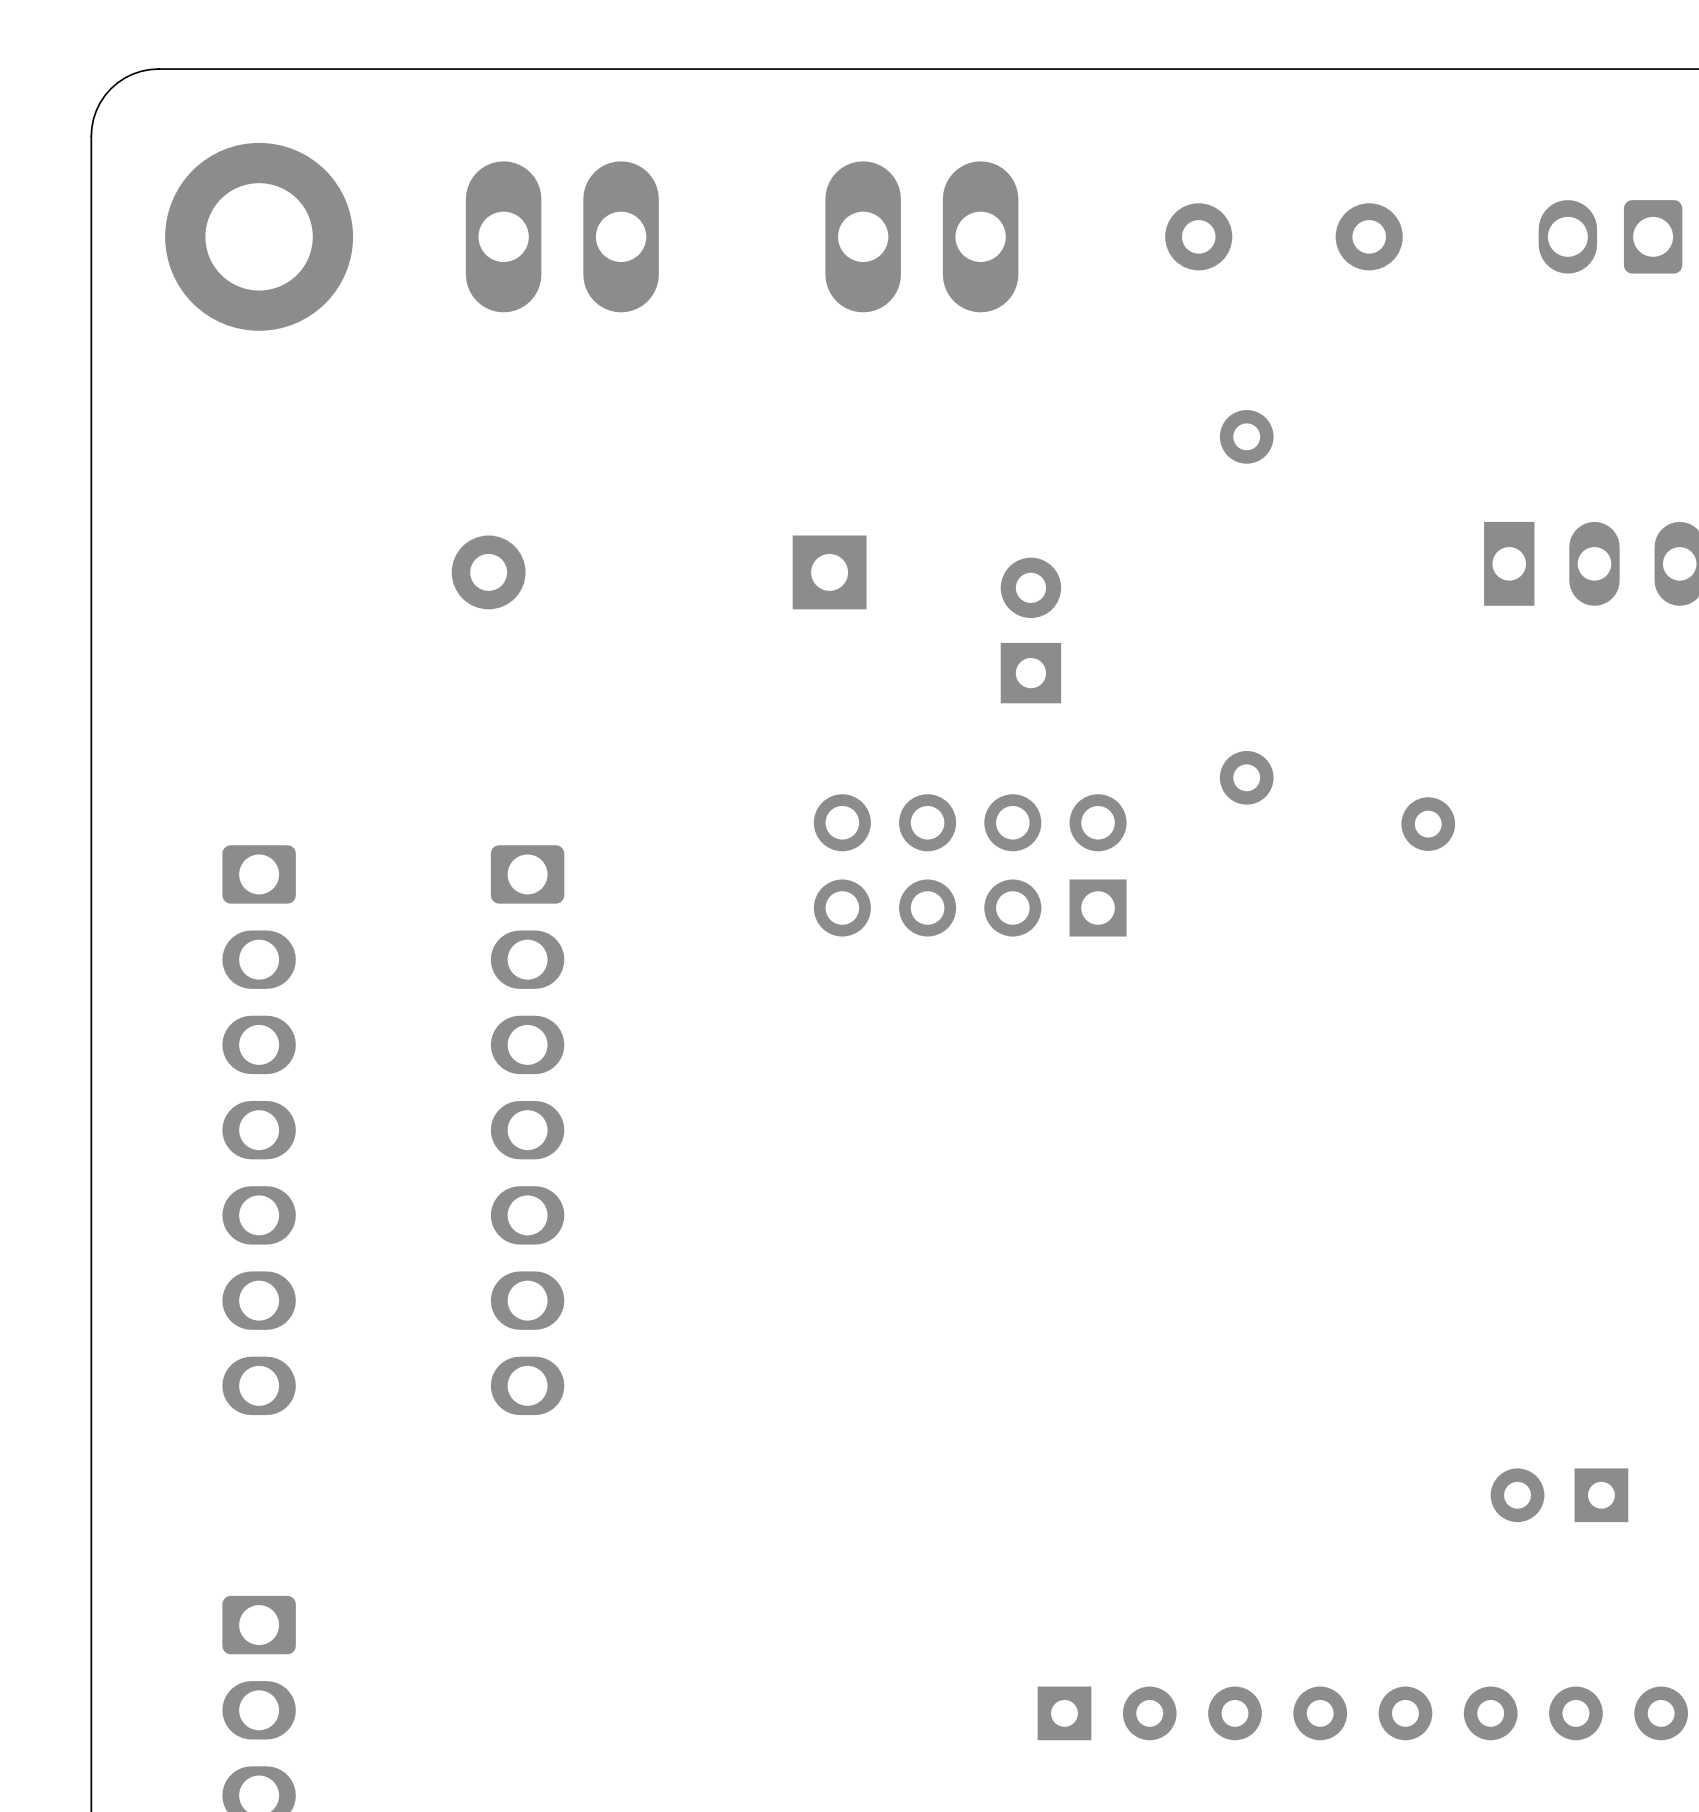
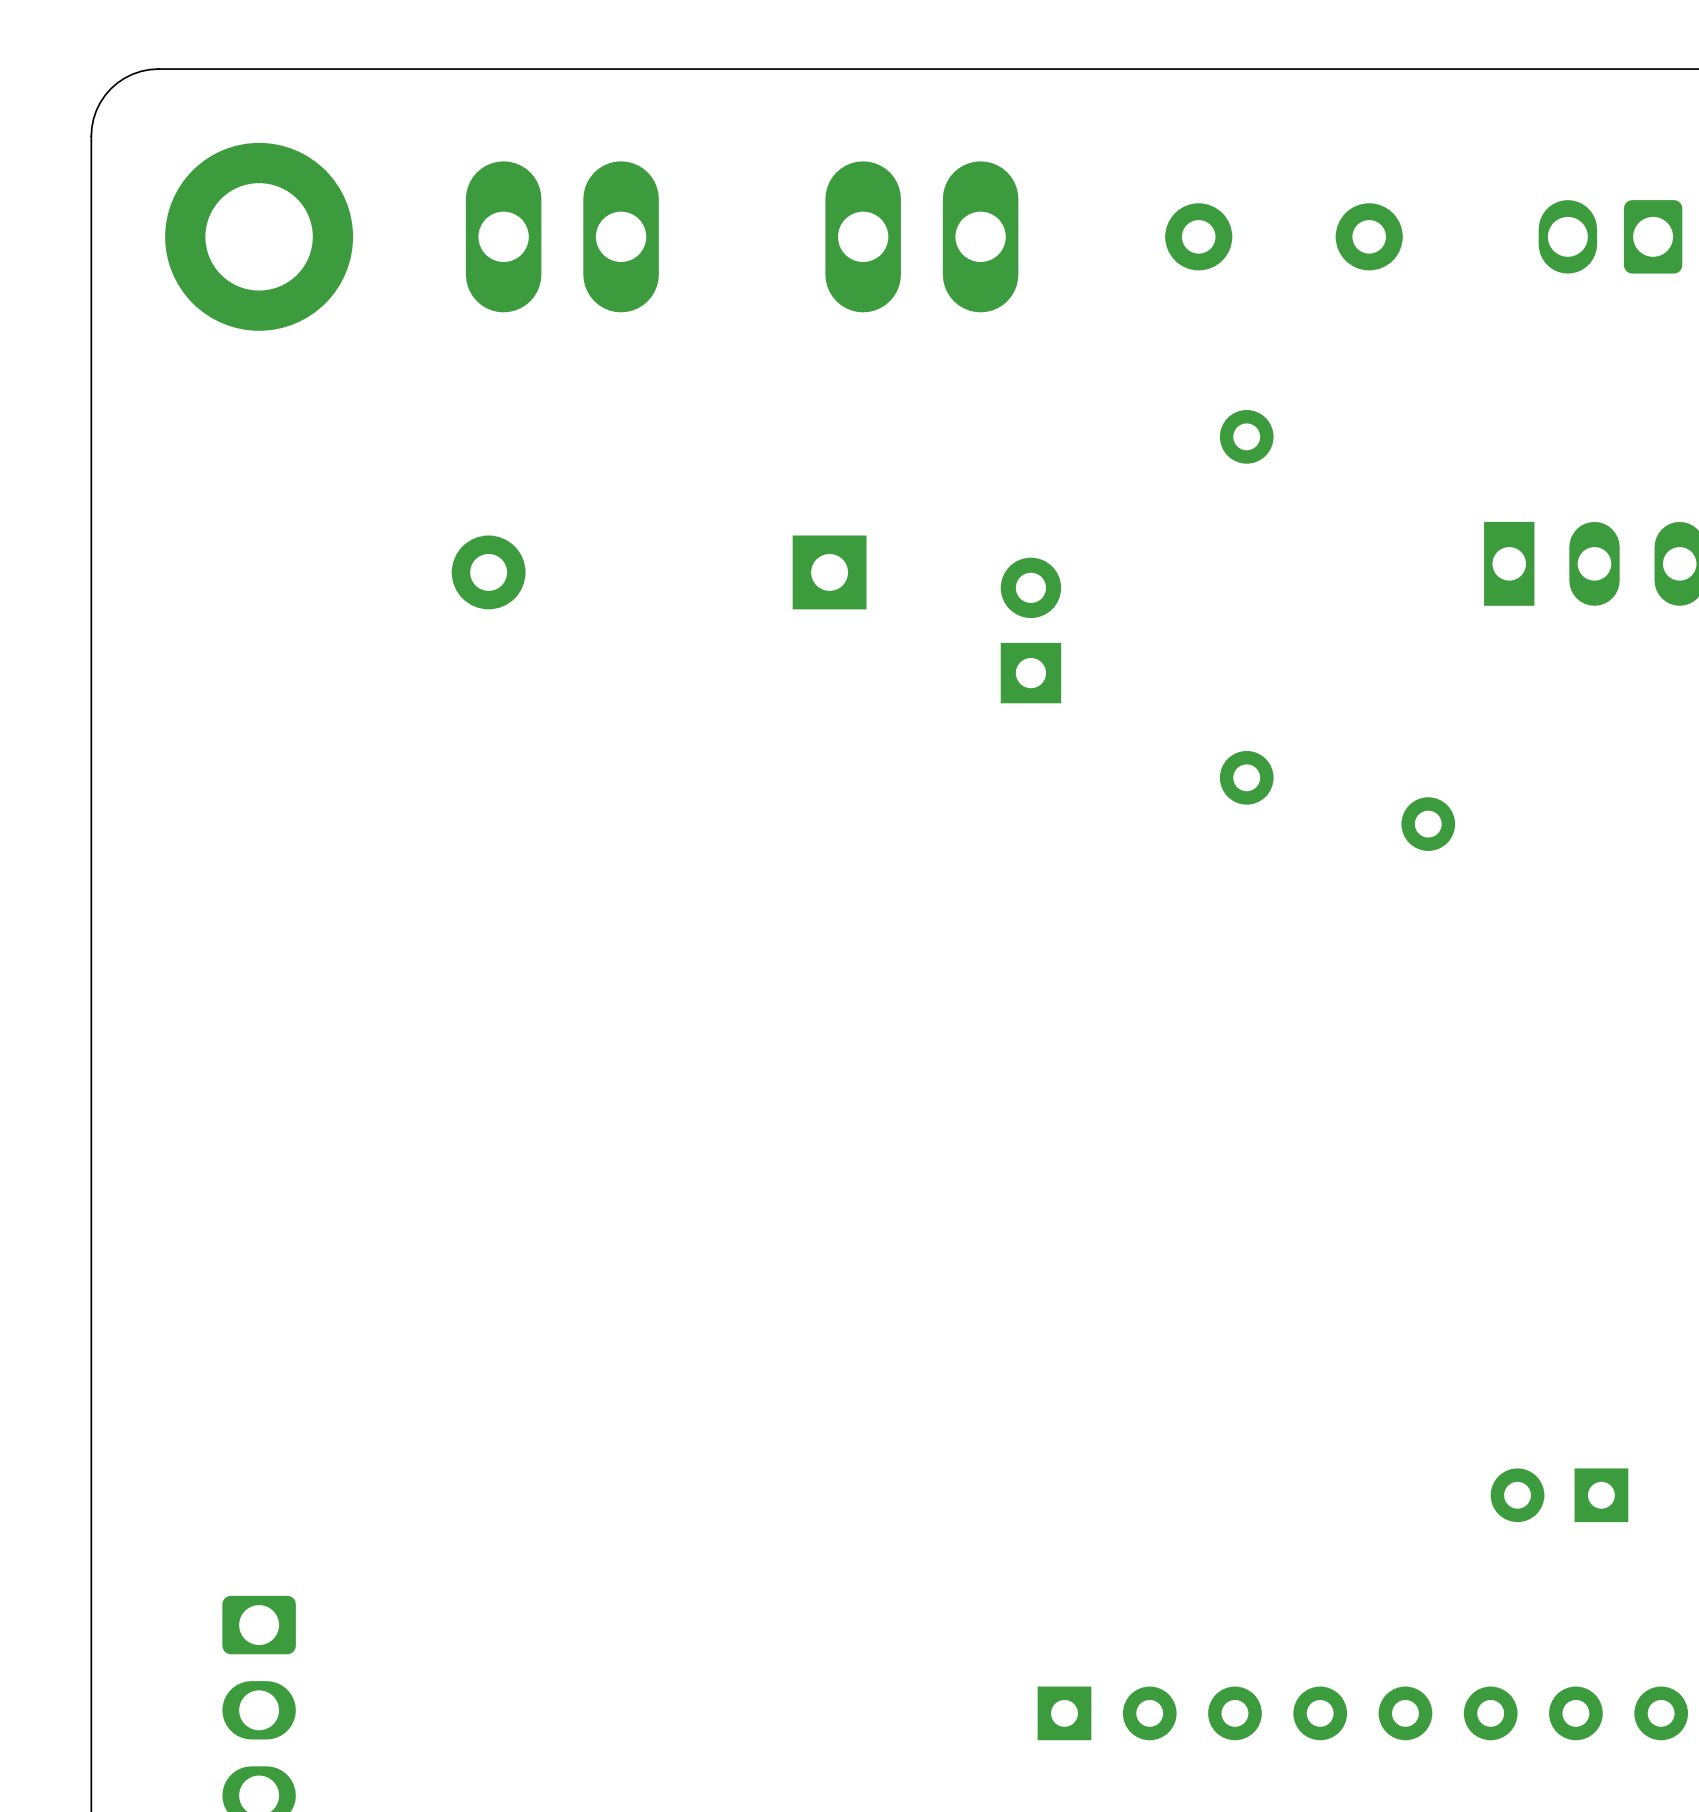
part: (970, 865) -> none
part: (259, 1130) -> none
part: (527, 1130) -> none

